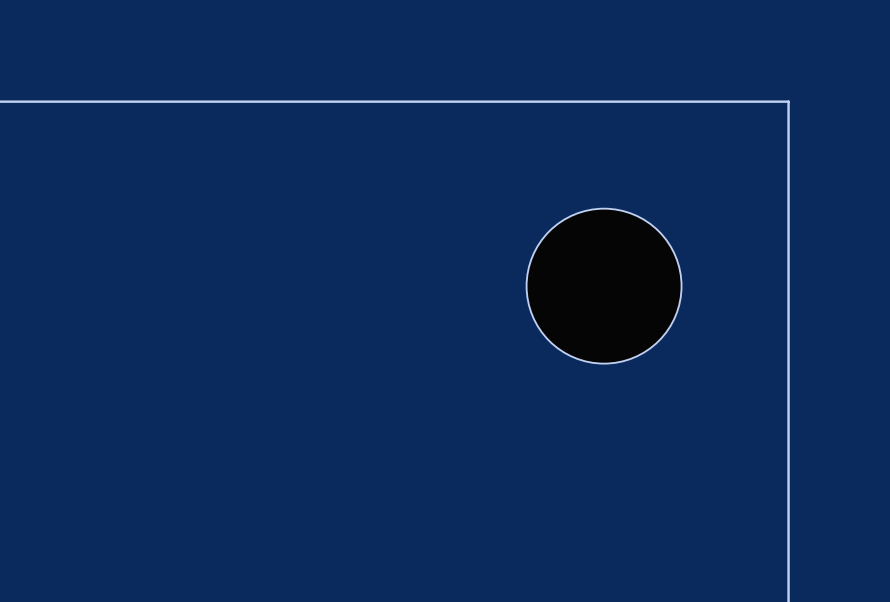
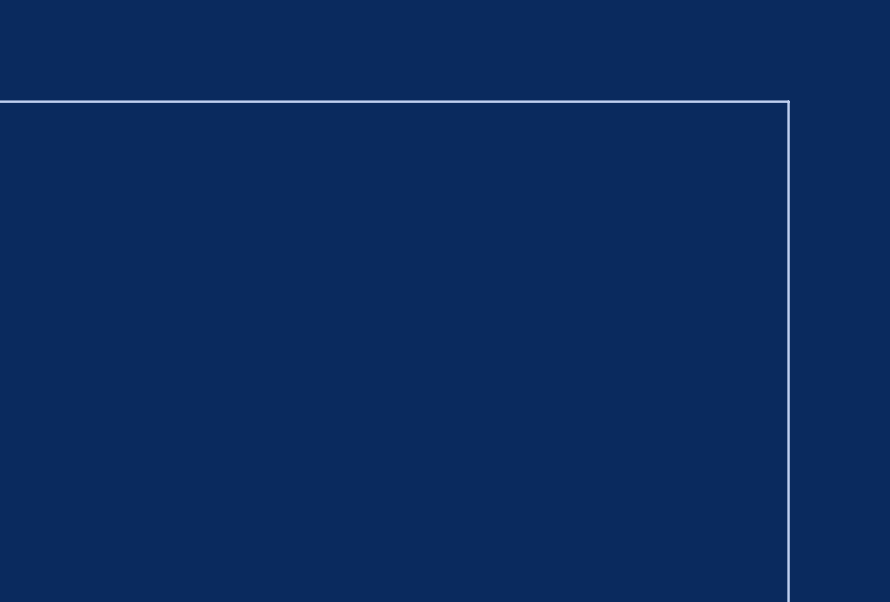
part: (604, 286) -> none

